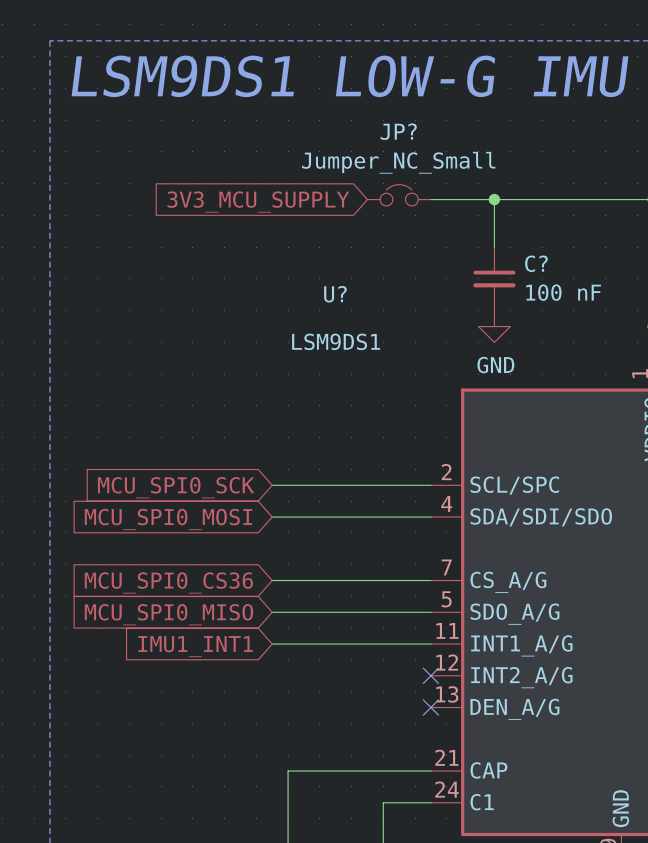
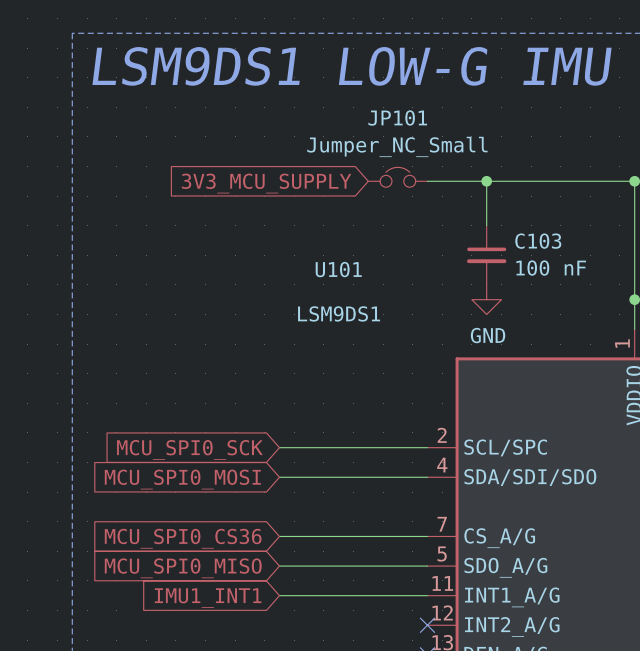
JP? name: JP? (398, 131) -> JP101 (397, 117)
C? name: C? (536, 263) -> C103 (538, 241)
U? name: U? (335, 294) -> U101 (338, 269)

